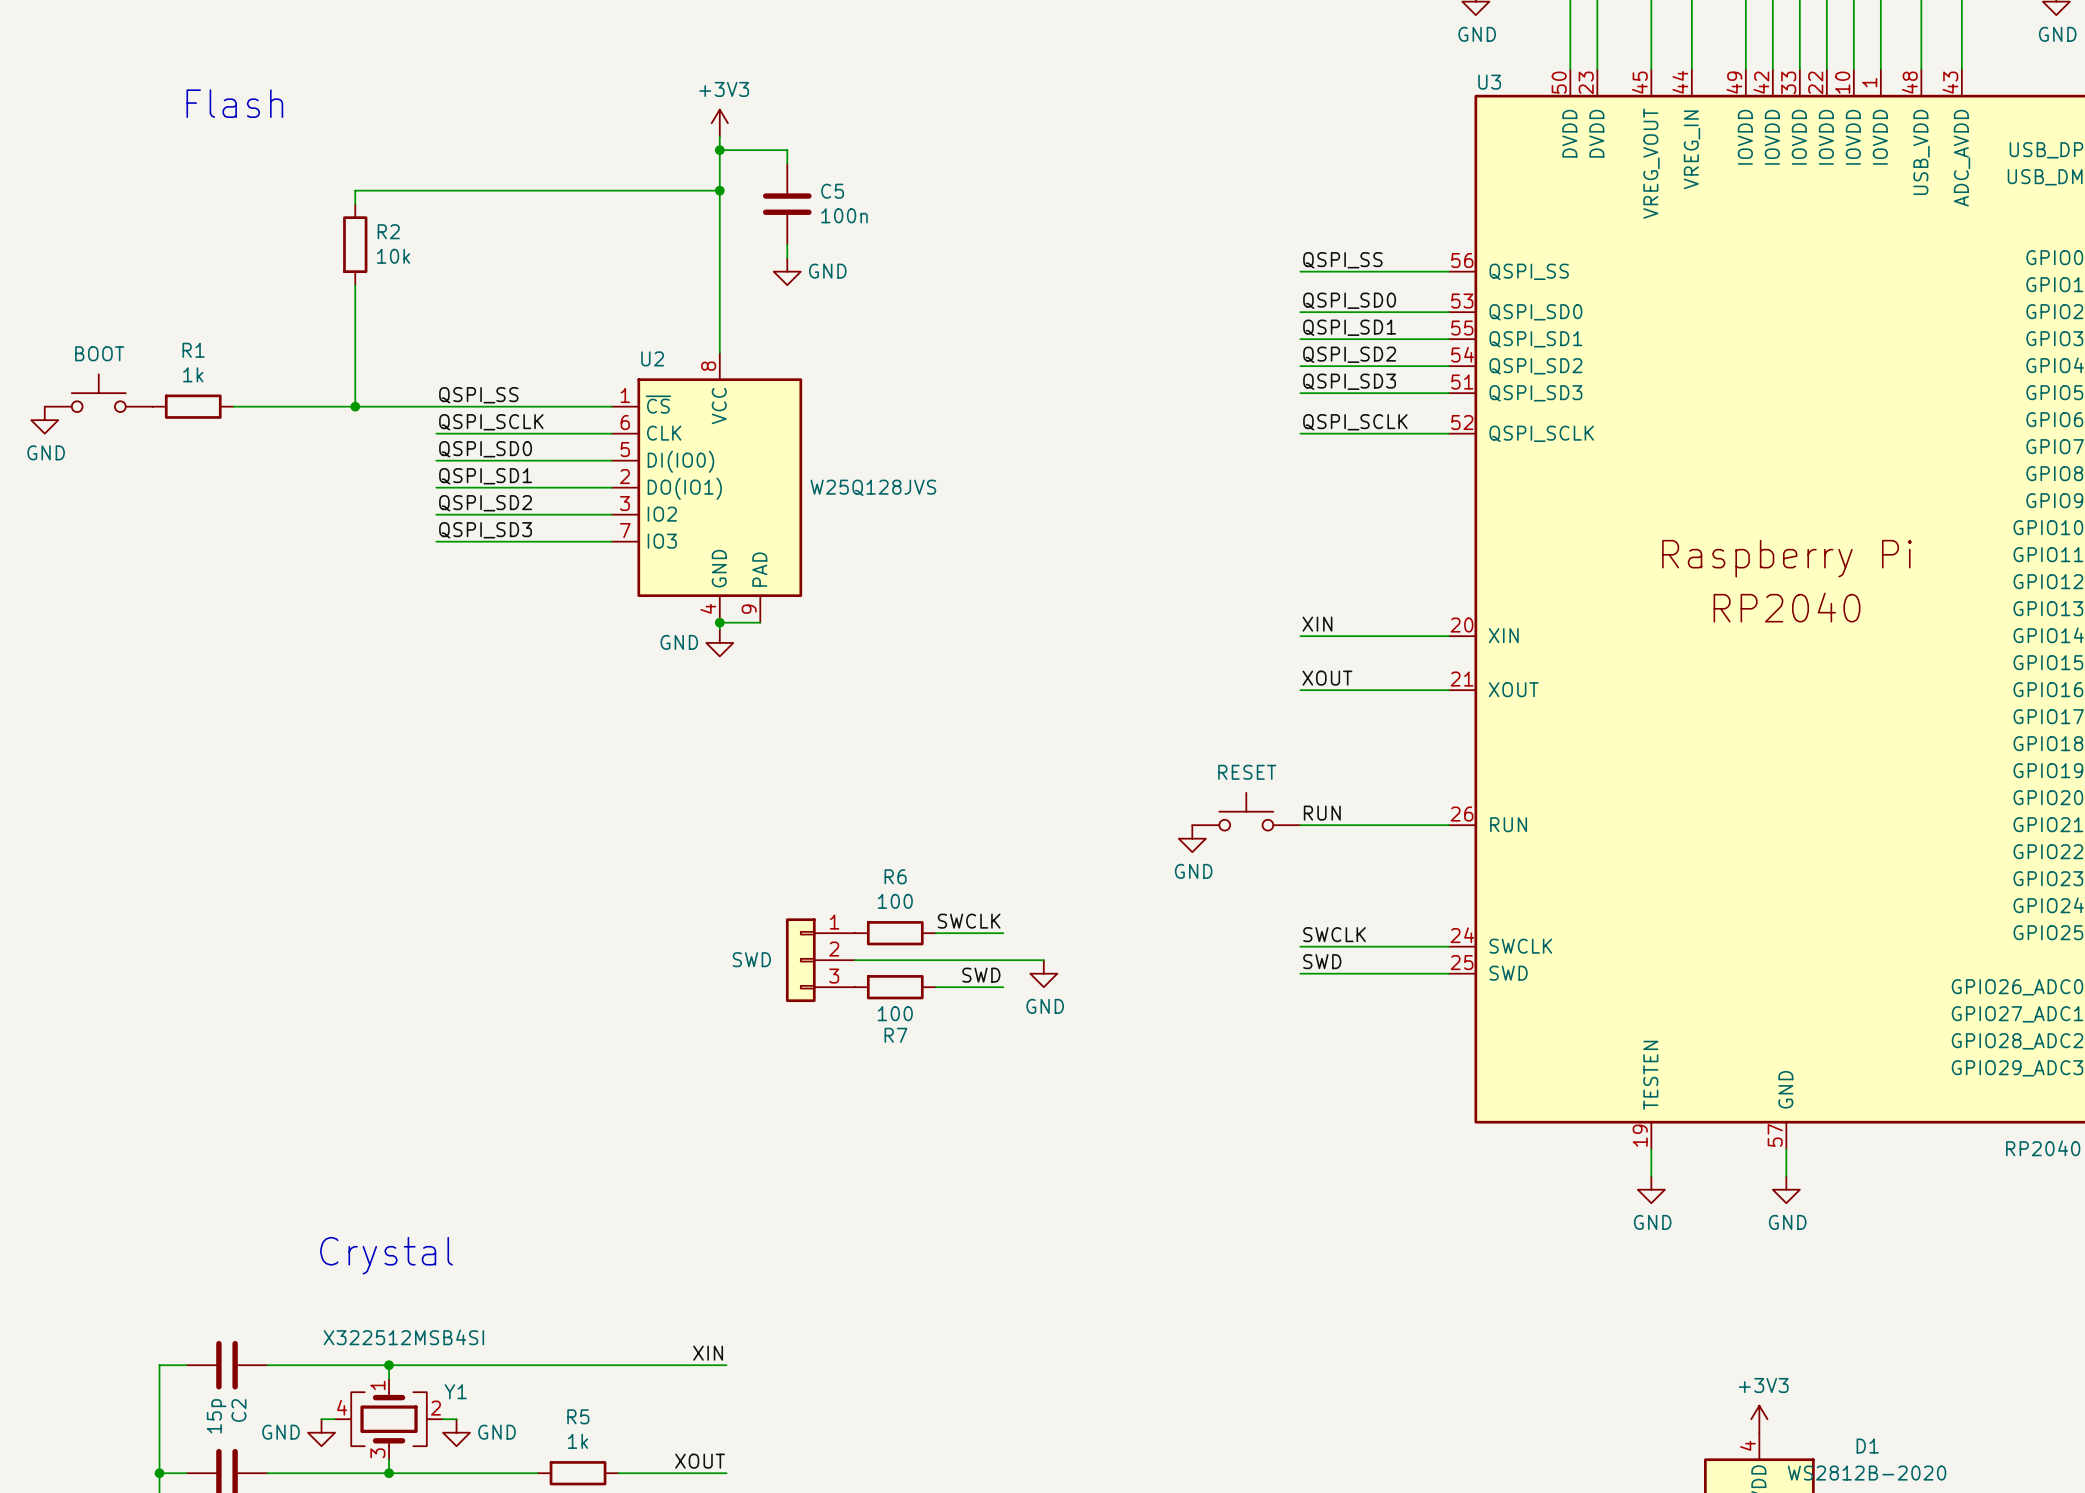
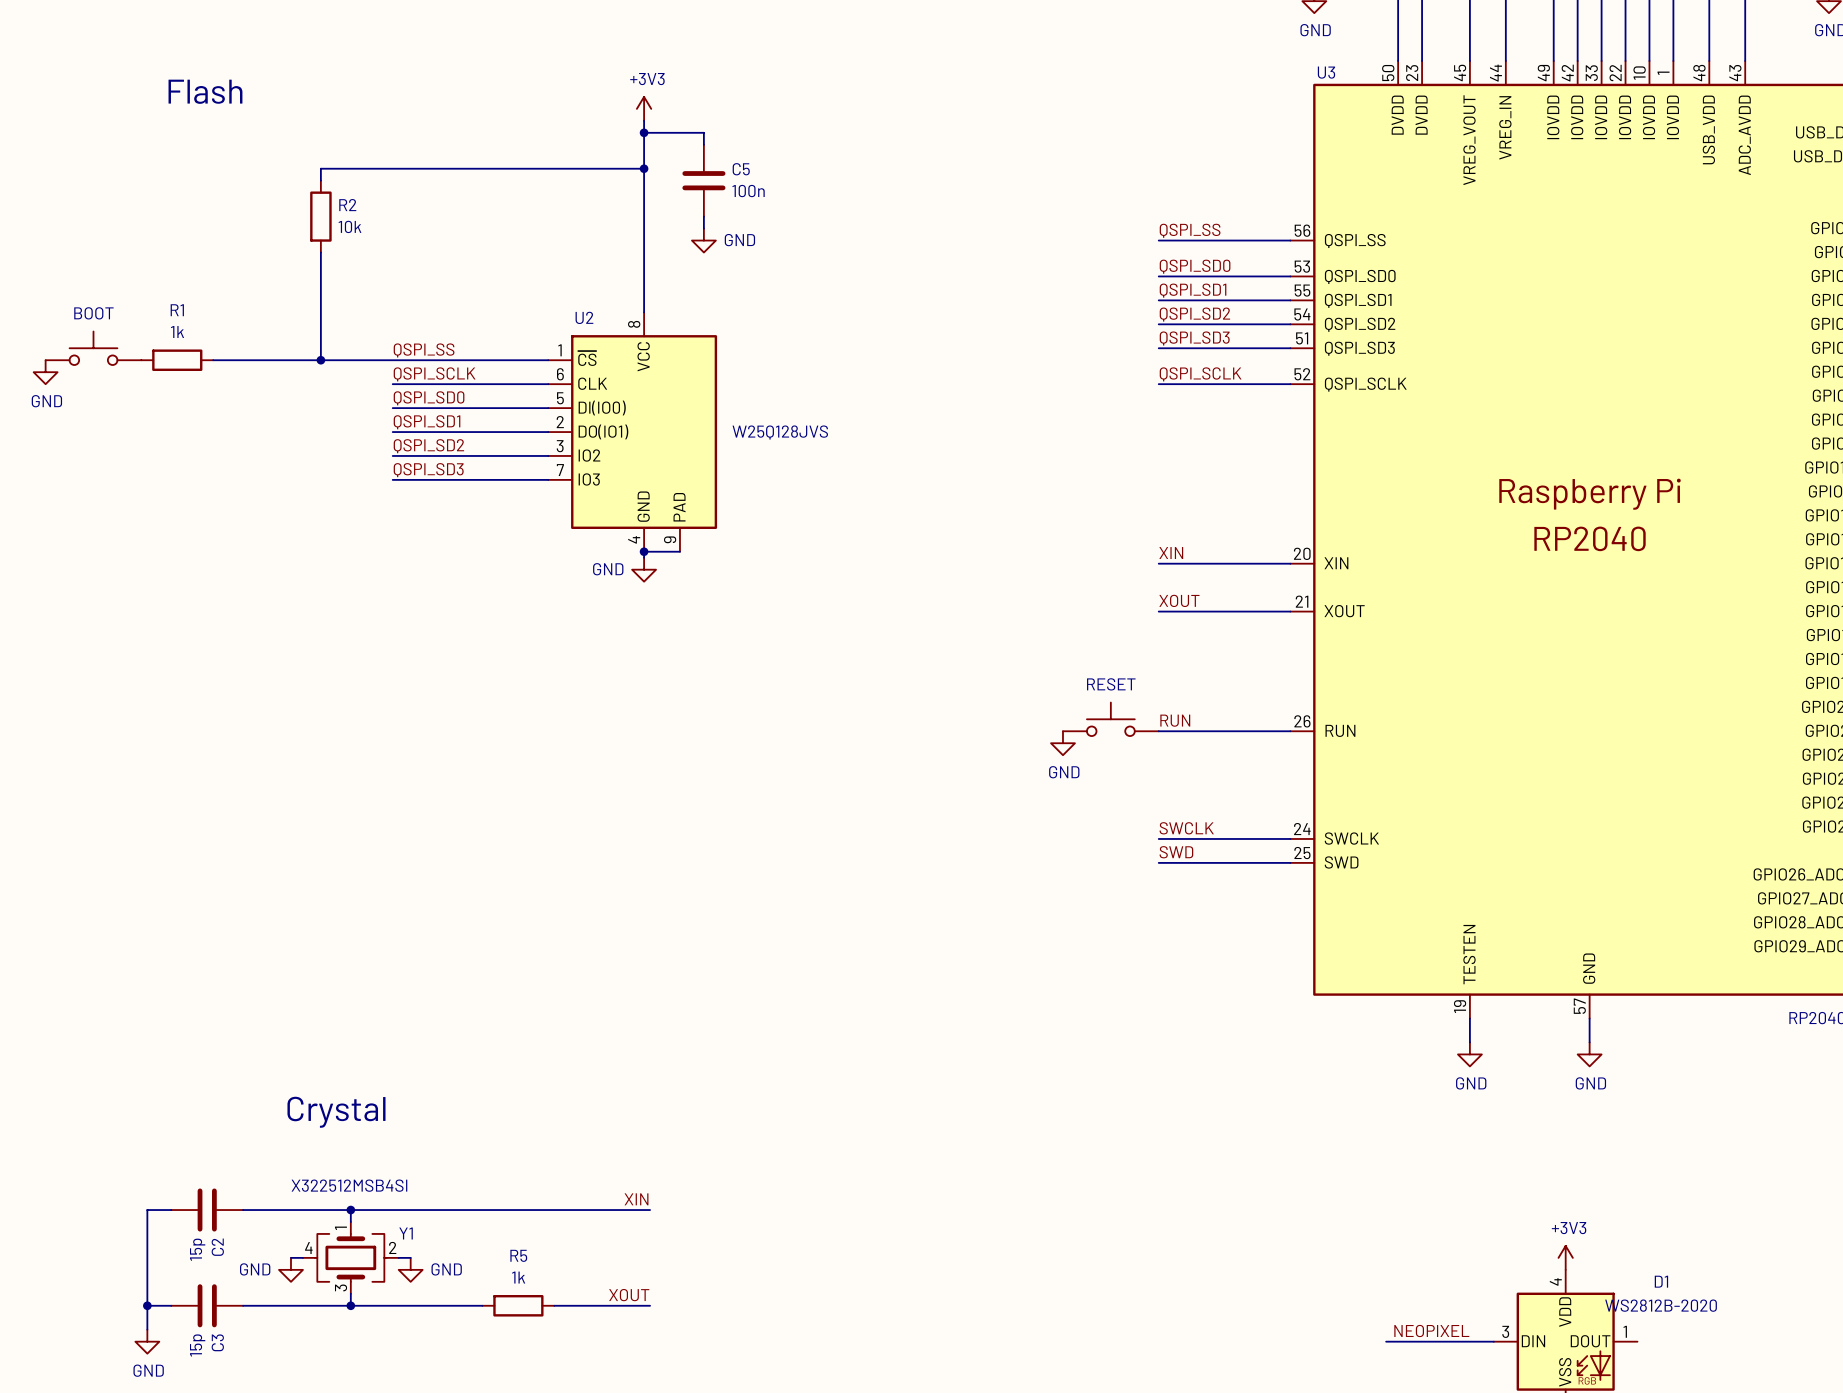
label: SWCLK (969, 921) -> none
R6: 100 (895, 933) -> none
wire: (935, 933) (1003, 933) -> none
part: SWD (820, 960) -> none
wire: (854, 960) (1043, 960) -> none
power symbol: GND (1043, 973) -> none
label: SWD (981, 975) -> none
R7: 100 (895, 987) -> none
wire: (935, 987) (1003, 987) -> none

